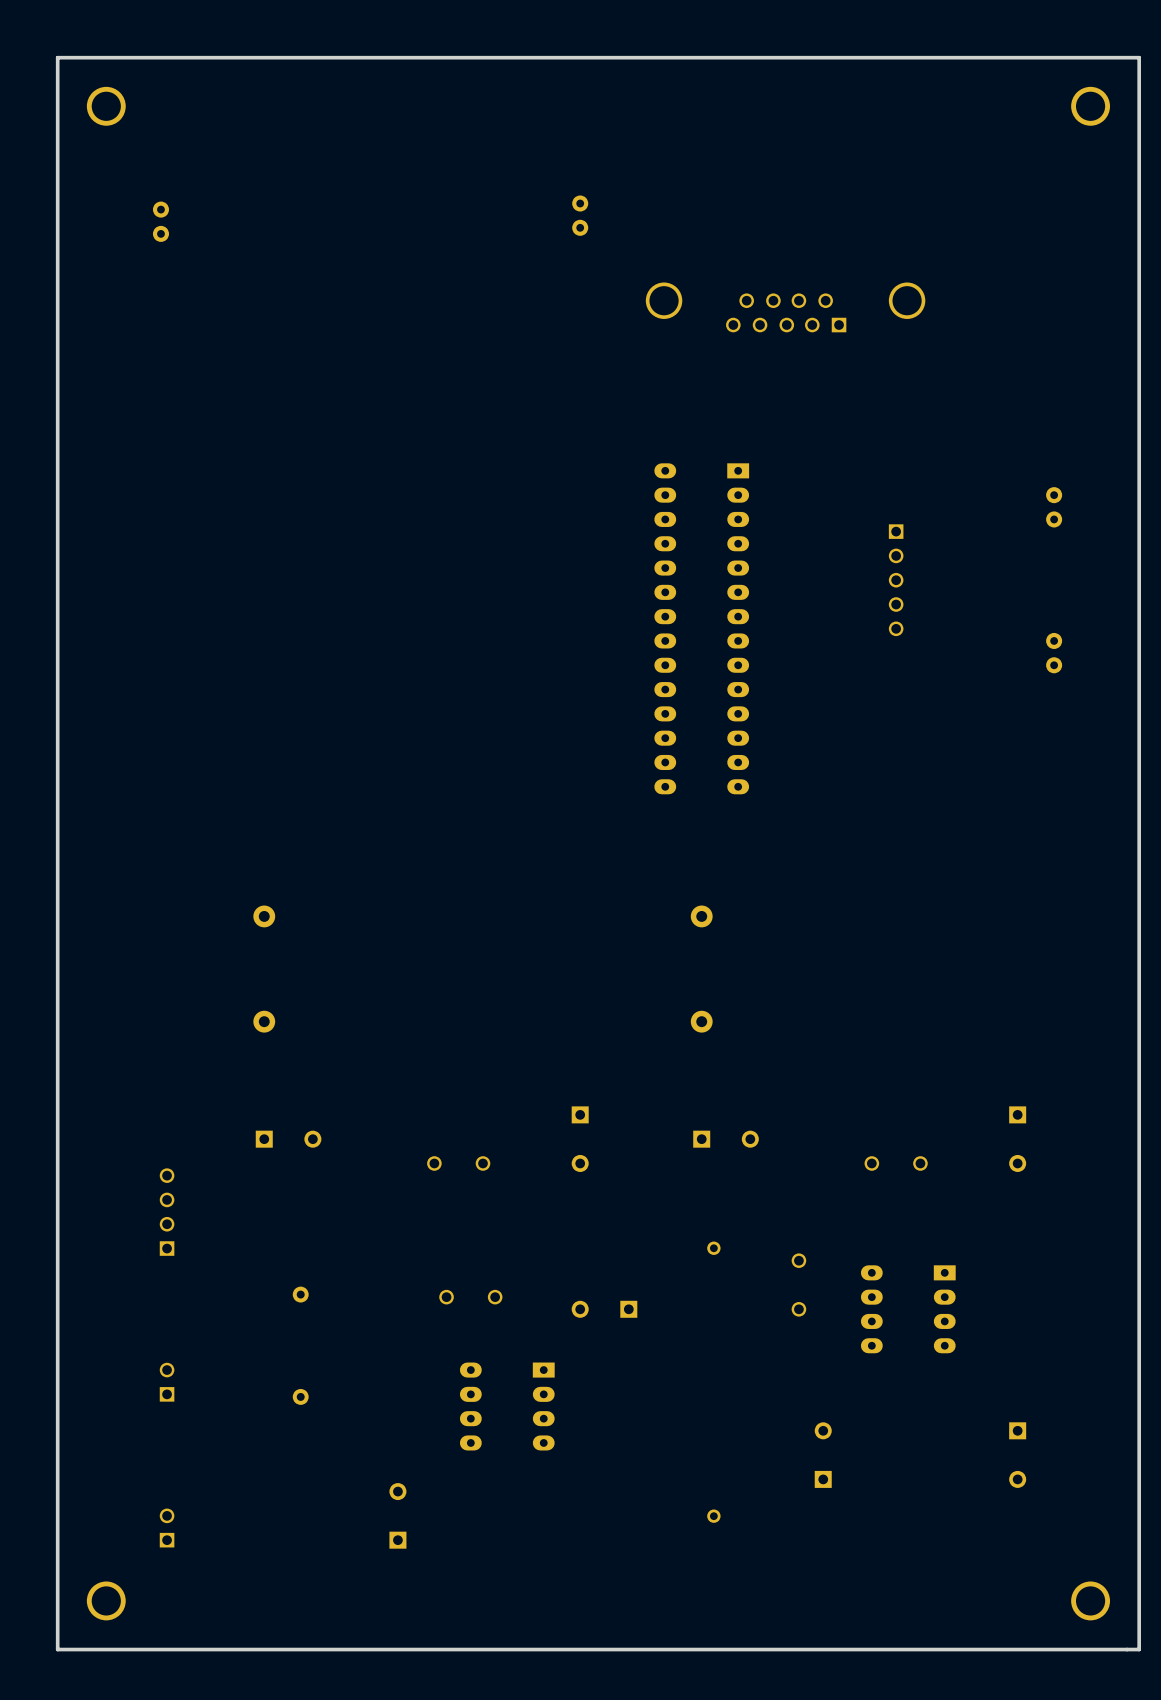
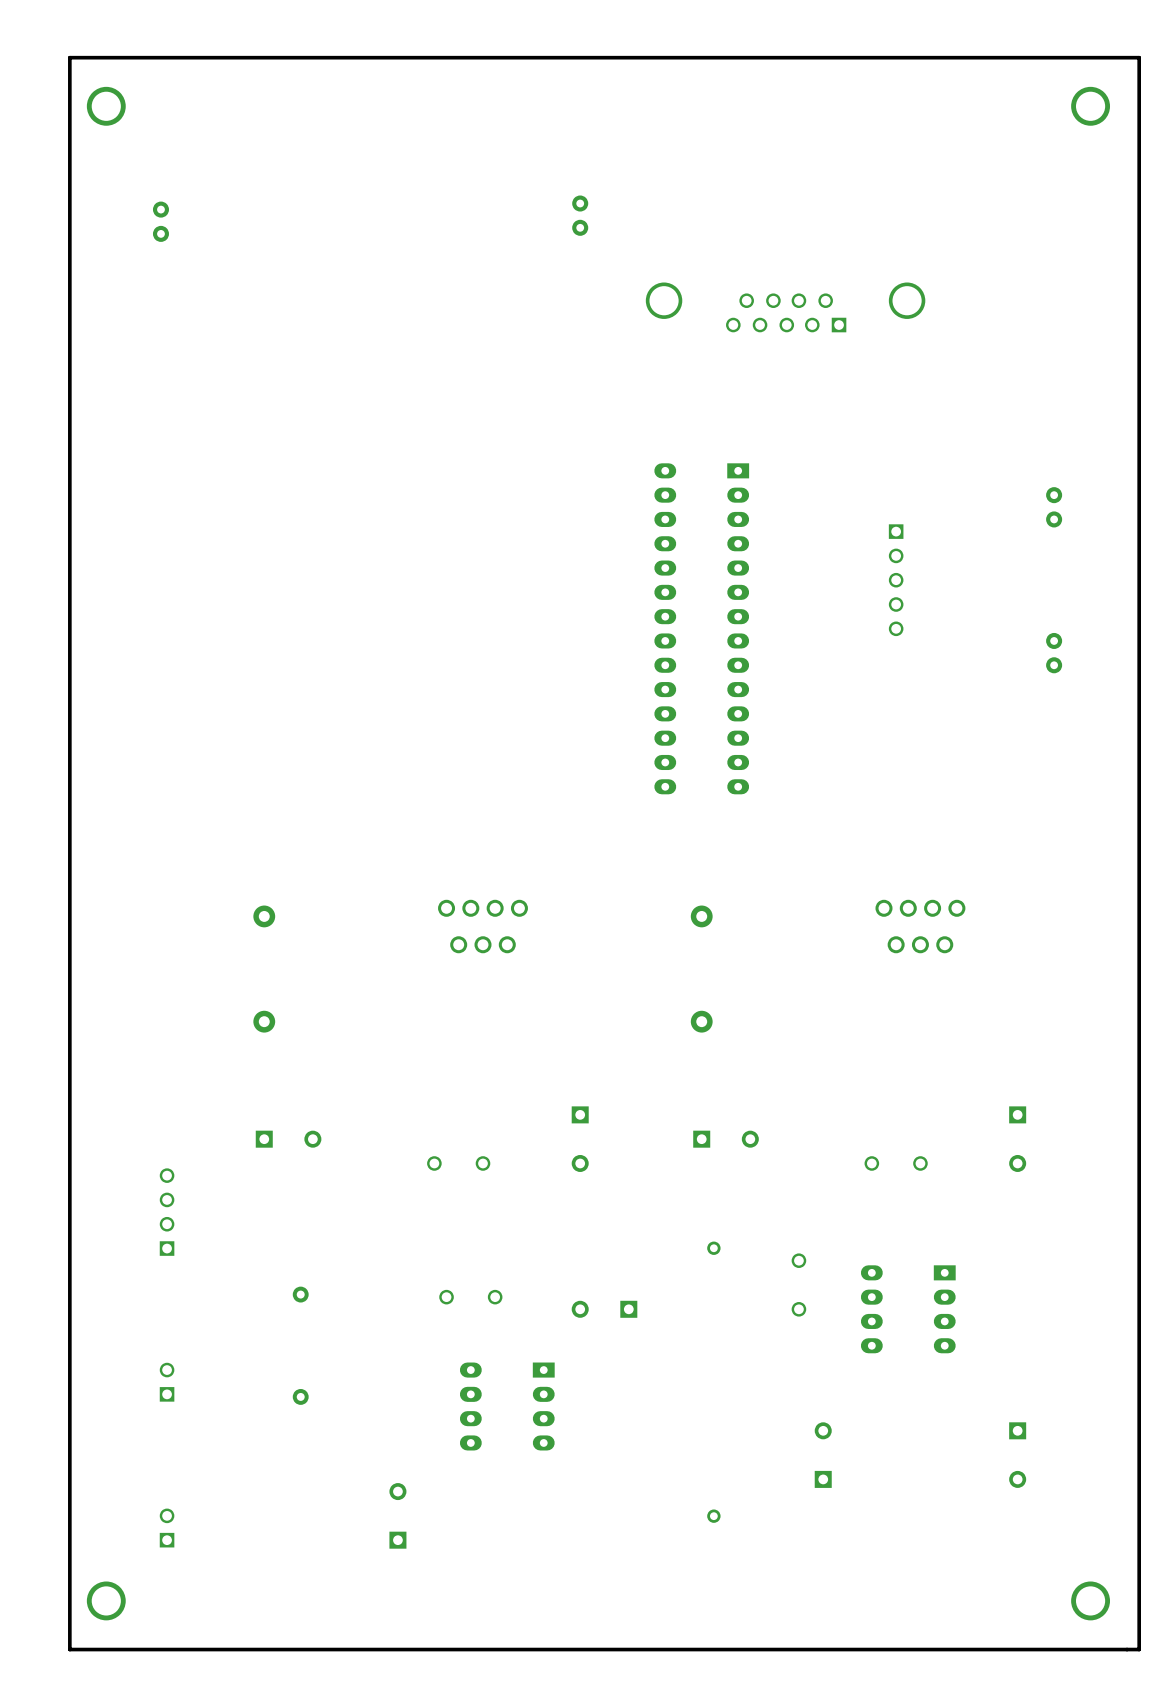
board edge: (69, 57) (57, 57) (57, 1649) (69, 1649) -> (69, 57) (69, 1649)
part: none -> (482, 926)
part: none -> (920, 926)

